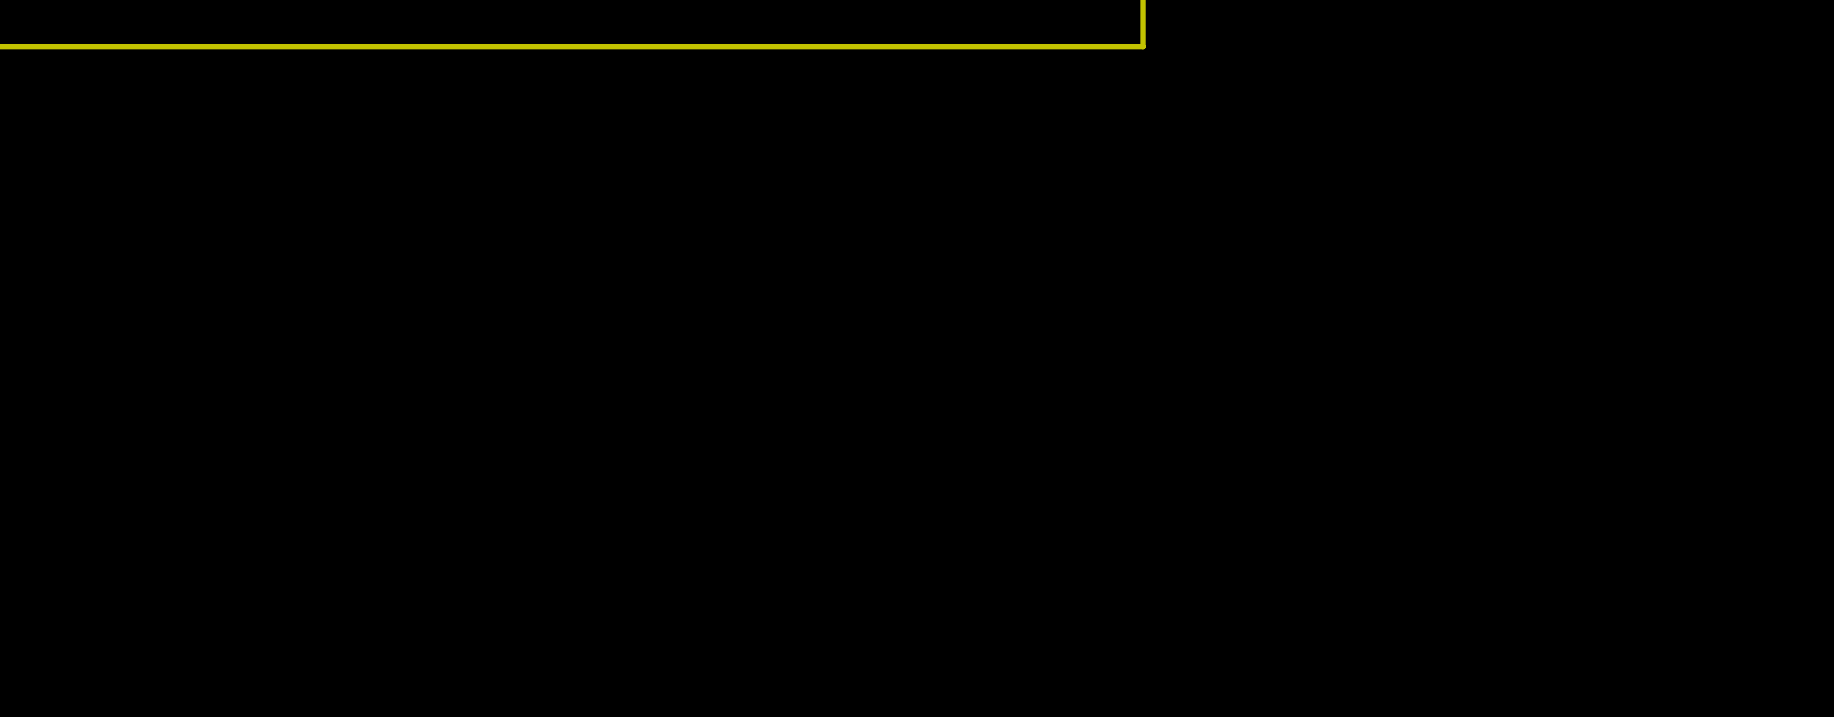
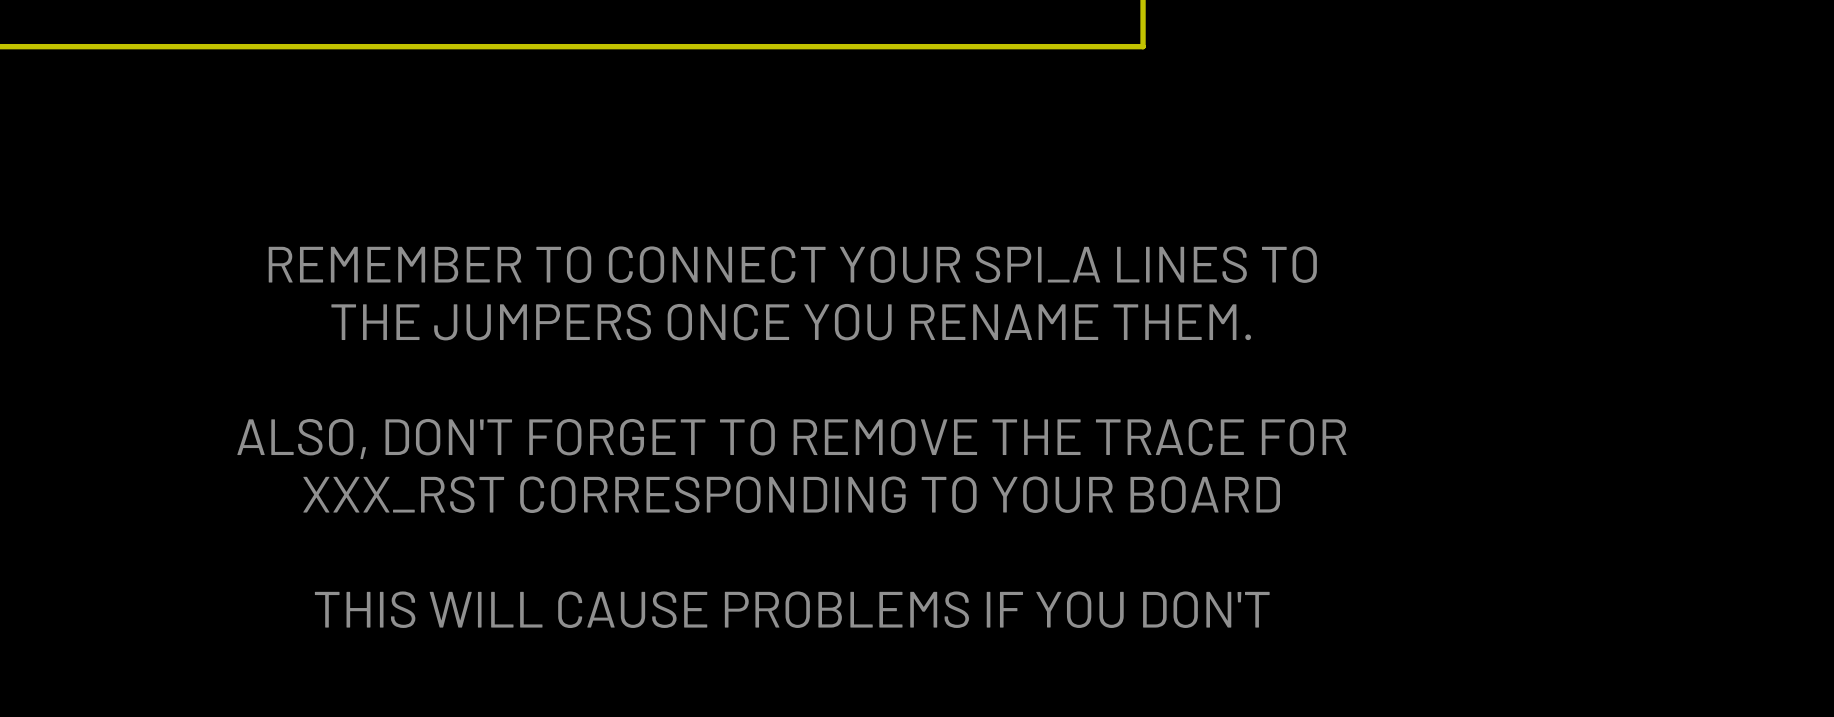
text: none -> REMEMBER TO CONNECT YOUR SPI_A LINES TO (792, 264)
text: none -> THE JUMPERS ONCE YOU RENAME THEM. (791, 322)
text: none -> ALSO, DON'T FORGET TO REMOVE THE TRACE FOR (791, 439)
text: none -> XXX_RST CORRESPONDING TO YOUR BOARD (791, 494)
text: none -> THIS WILL CAUSE PROBLEMS IF YOU DON'T (792, 609)

